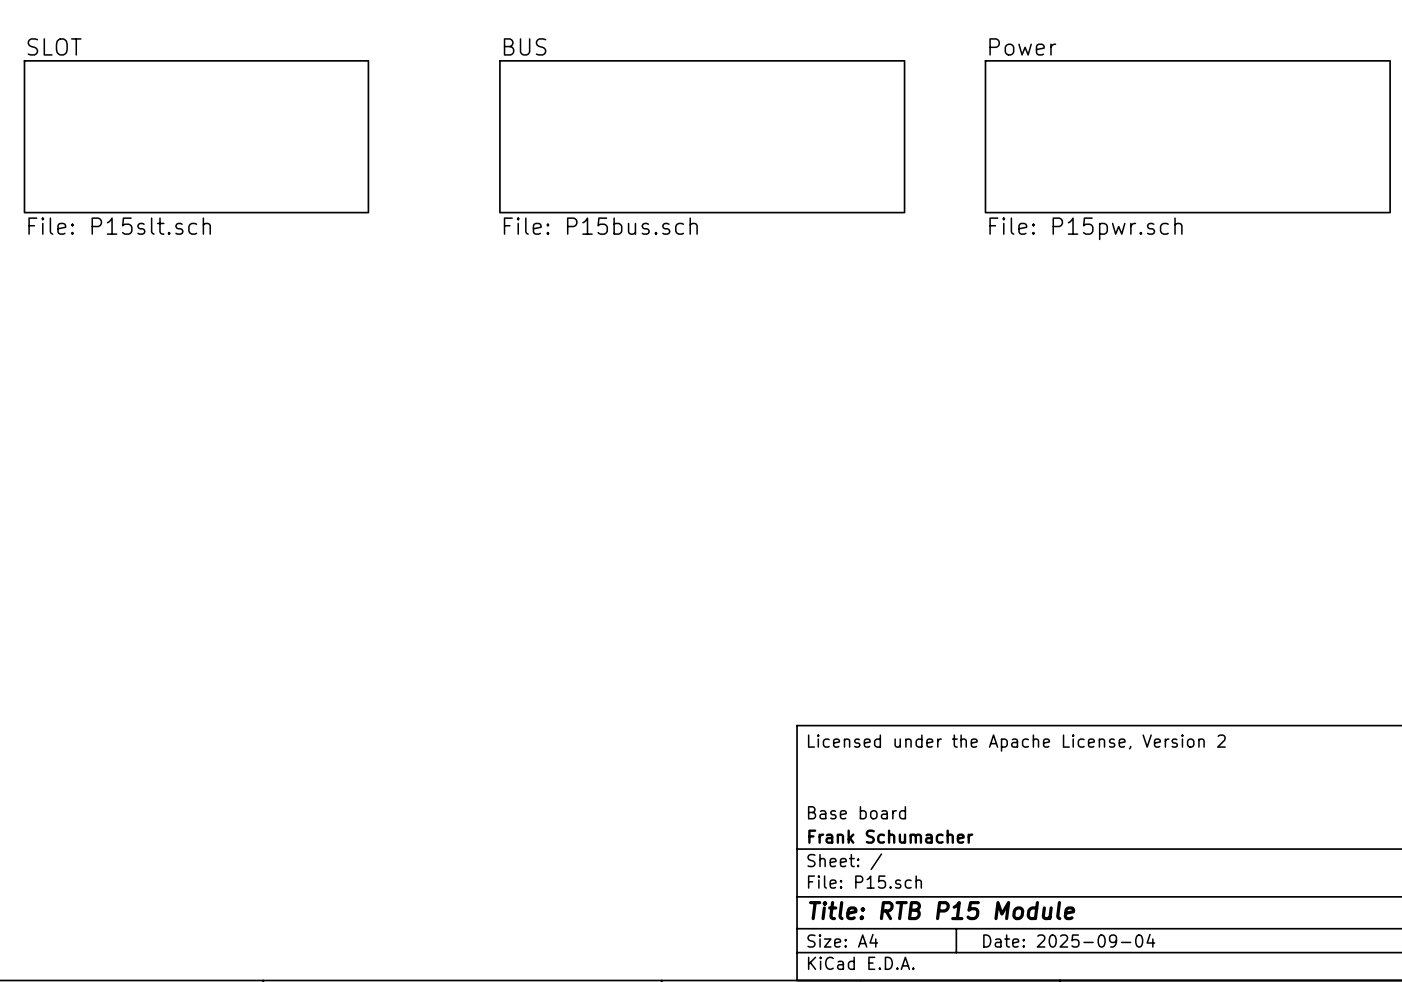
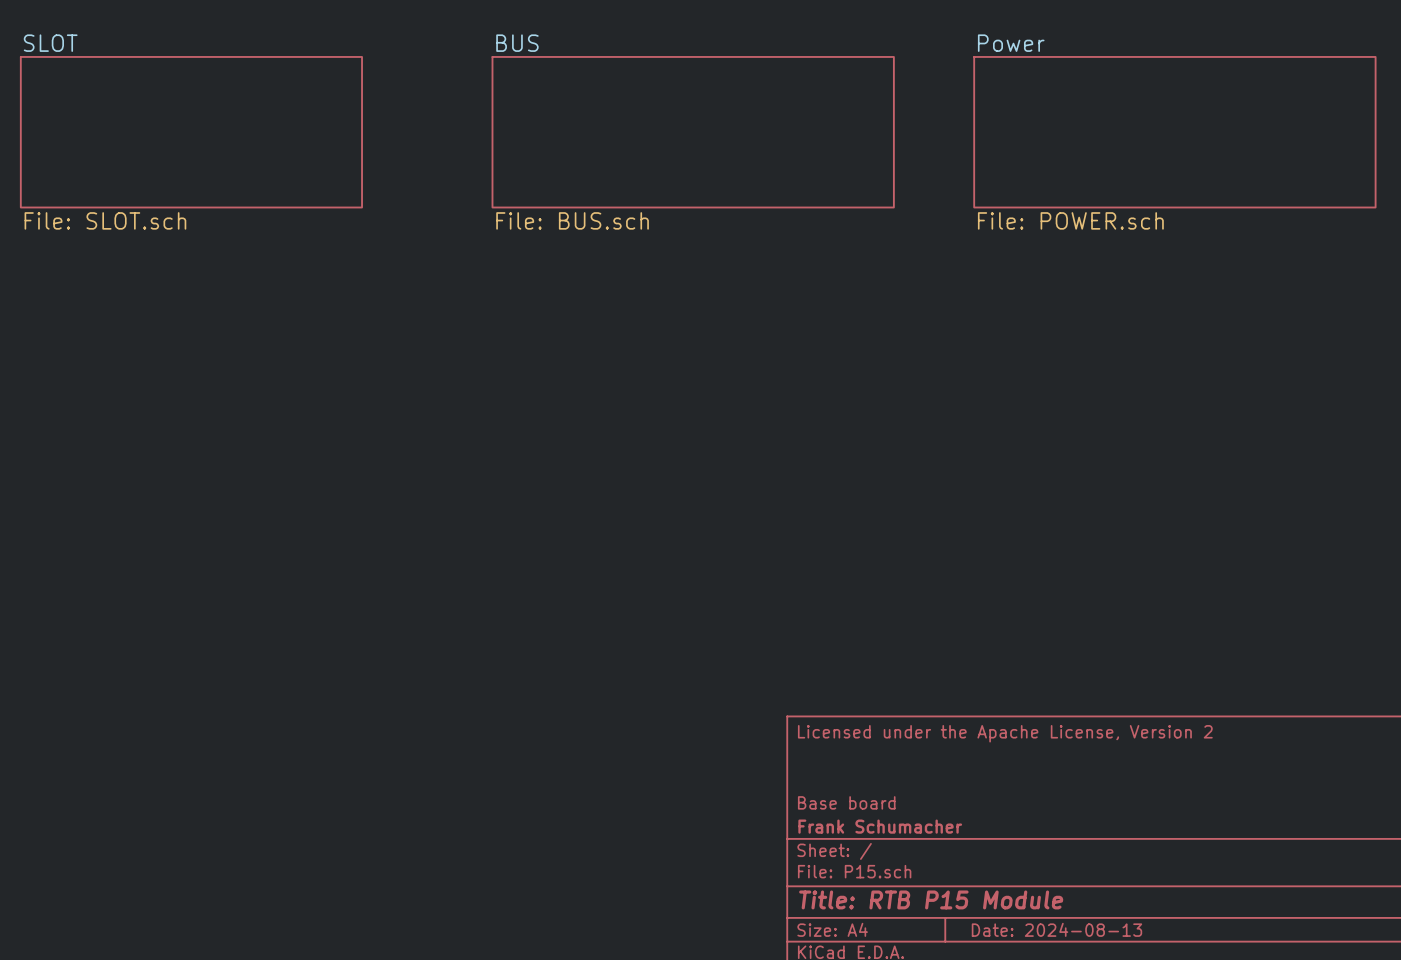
sheet SLOT value: File: P15slt.sch (119, 226) -> File: SLOT.sch (105, 220)
sheet BUS value: File: P15bus.sch (600, 226) -> File: BUS.sch (572, 220)
sheet Power value: File: P15pwr.sch (1085, 228) -> File: POWER.sch (1070, 220)
title block: Date: 2025-09-04 (1069, 940) -> Date: 2024-08-13 (1056, 929)

